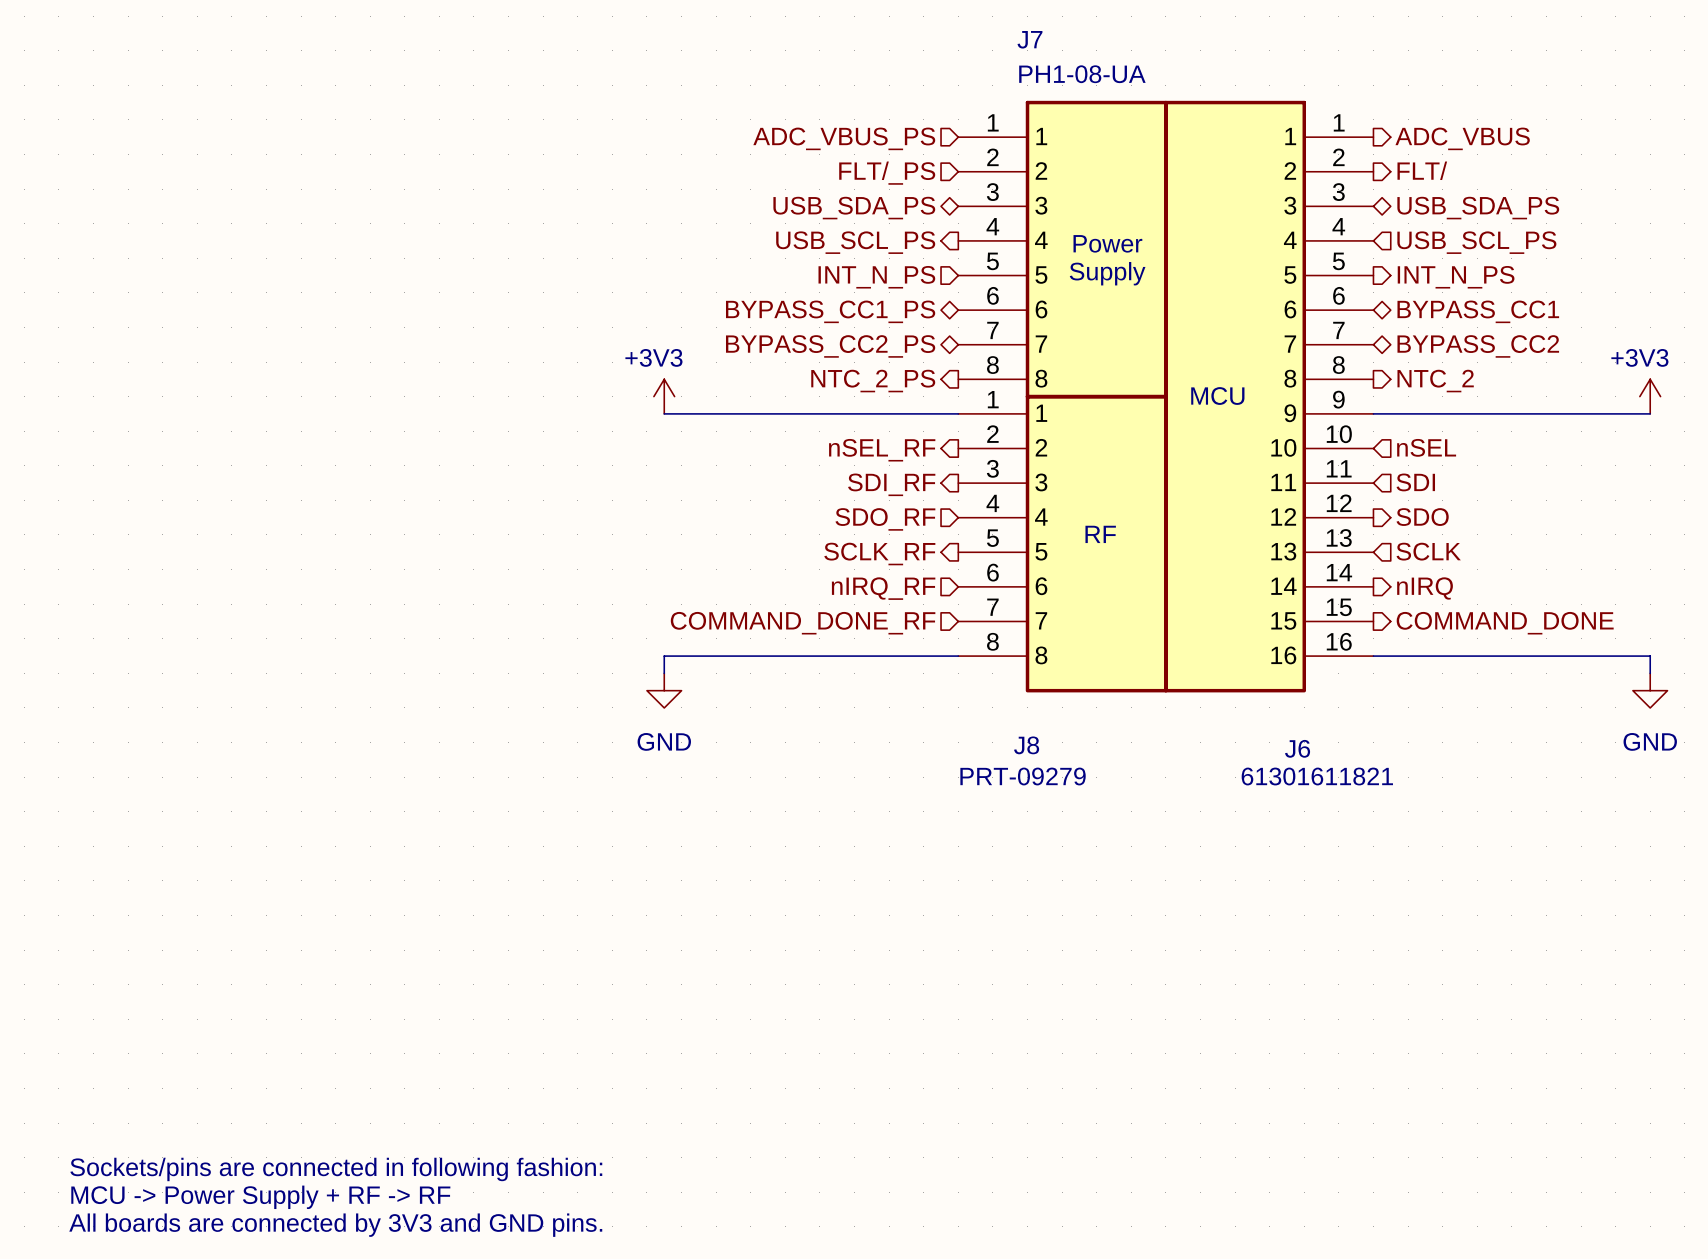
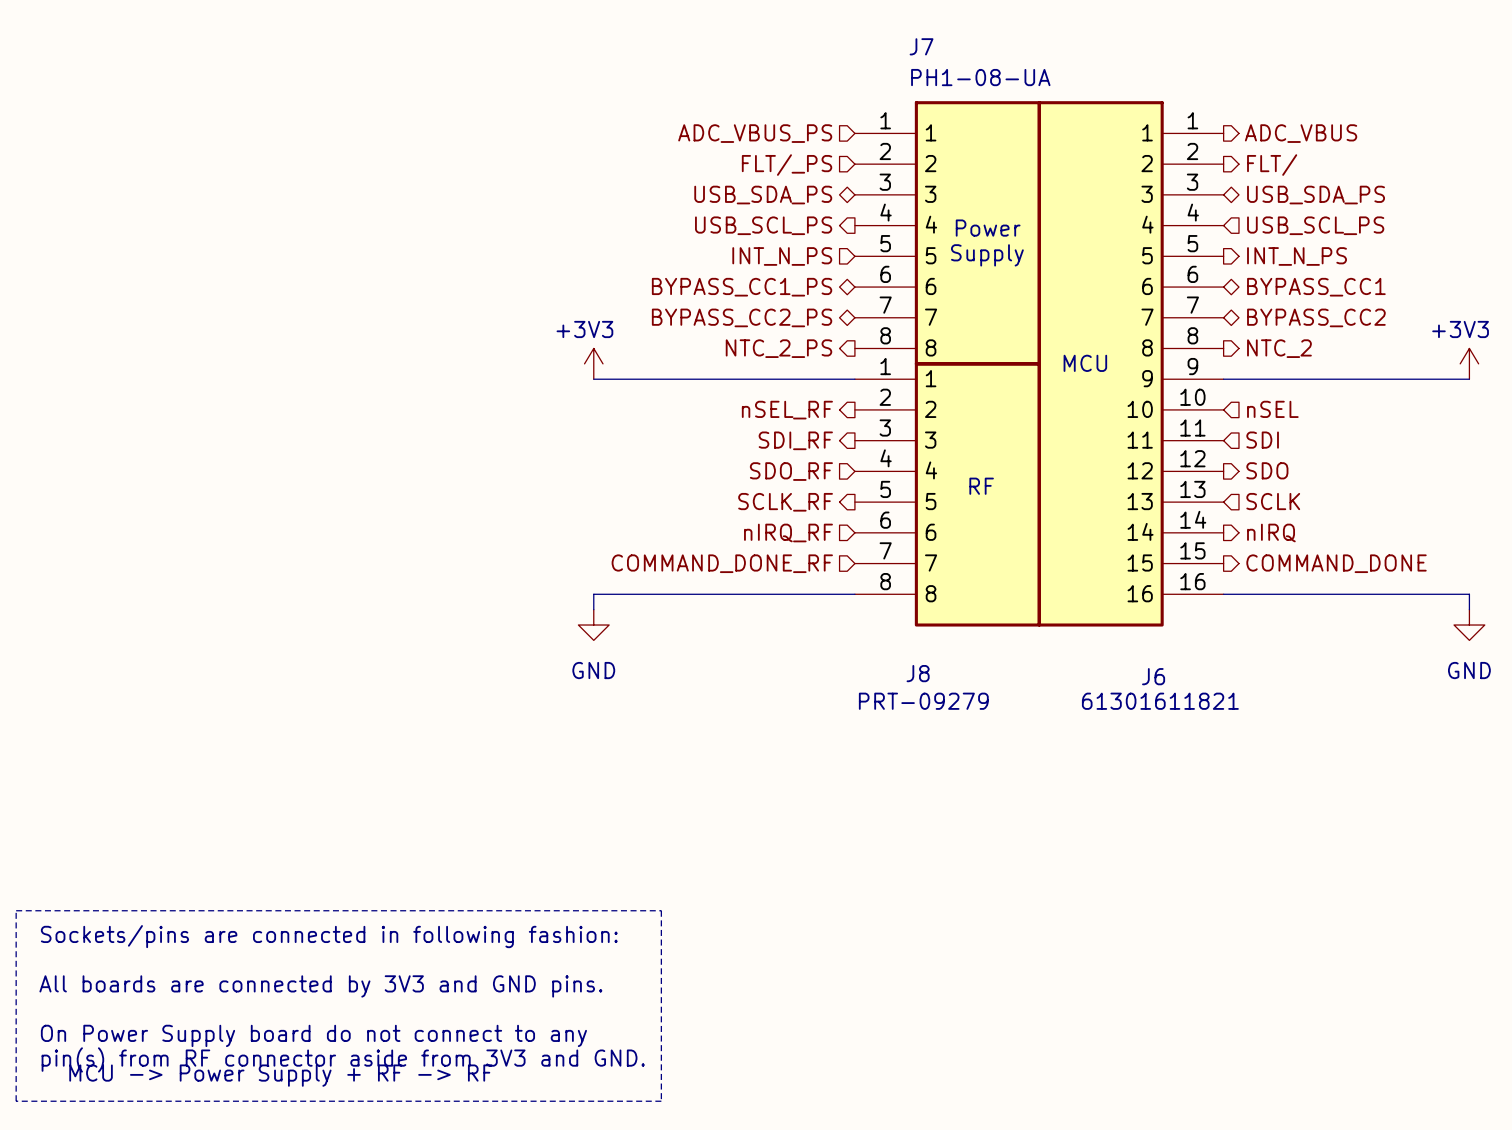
line: none -> (16, 910) (661, 910) (661, 1101) (16, 1101) (16, 910)
text: none -> On Power Supply board do not connect to any (313, 1035)
text position: Sockets/pins are connected in following fashion: (336, 1169) -> Sockets/pins are connected in following fashion: (329, 936)
text: none -> pin(s) from RF connector aside from 3V3 and GND. (343, 1059)
text position: All boards are connected by 3V3 and GND pins. (335, 1225) -> All boards are connected by 3V3 and GND pins. (320, 986)

